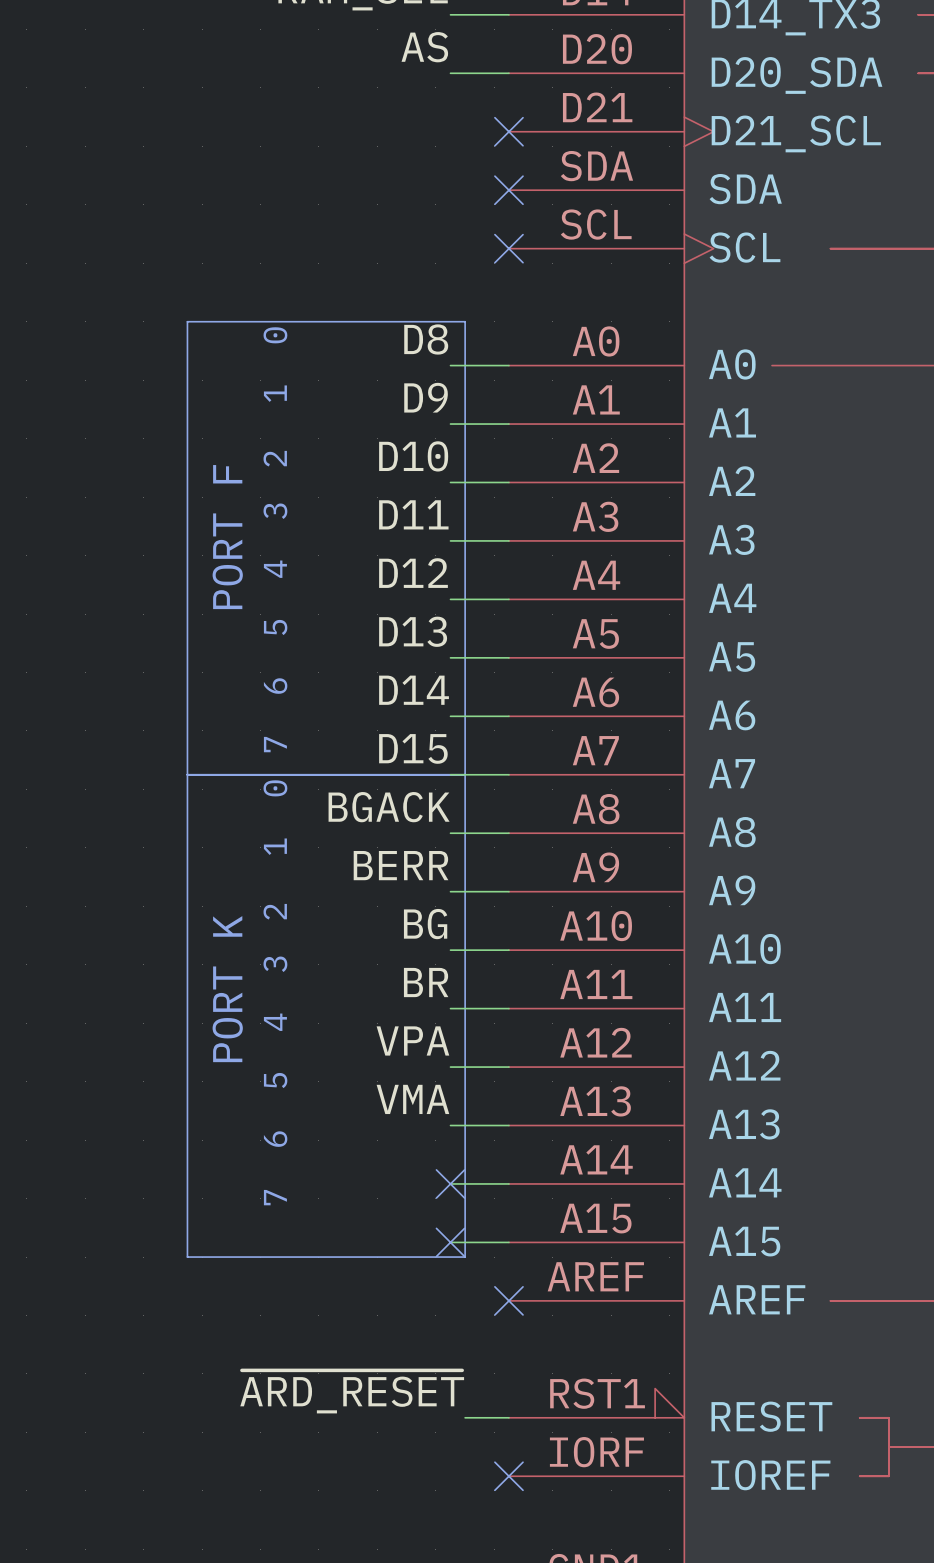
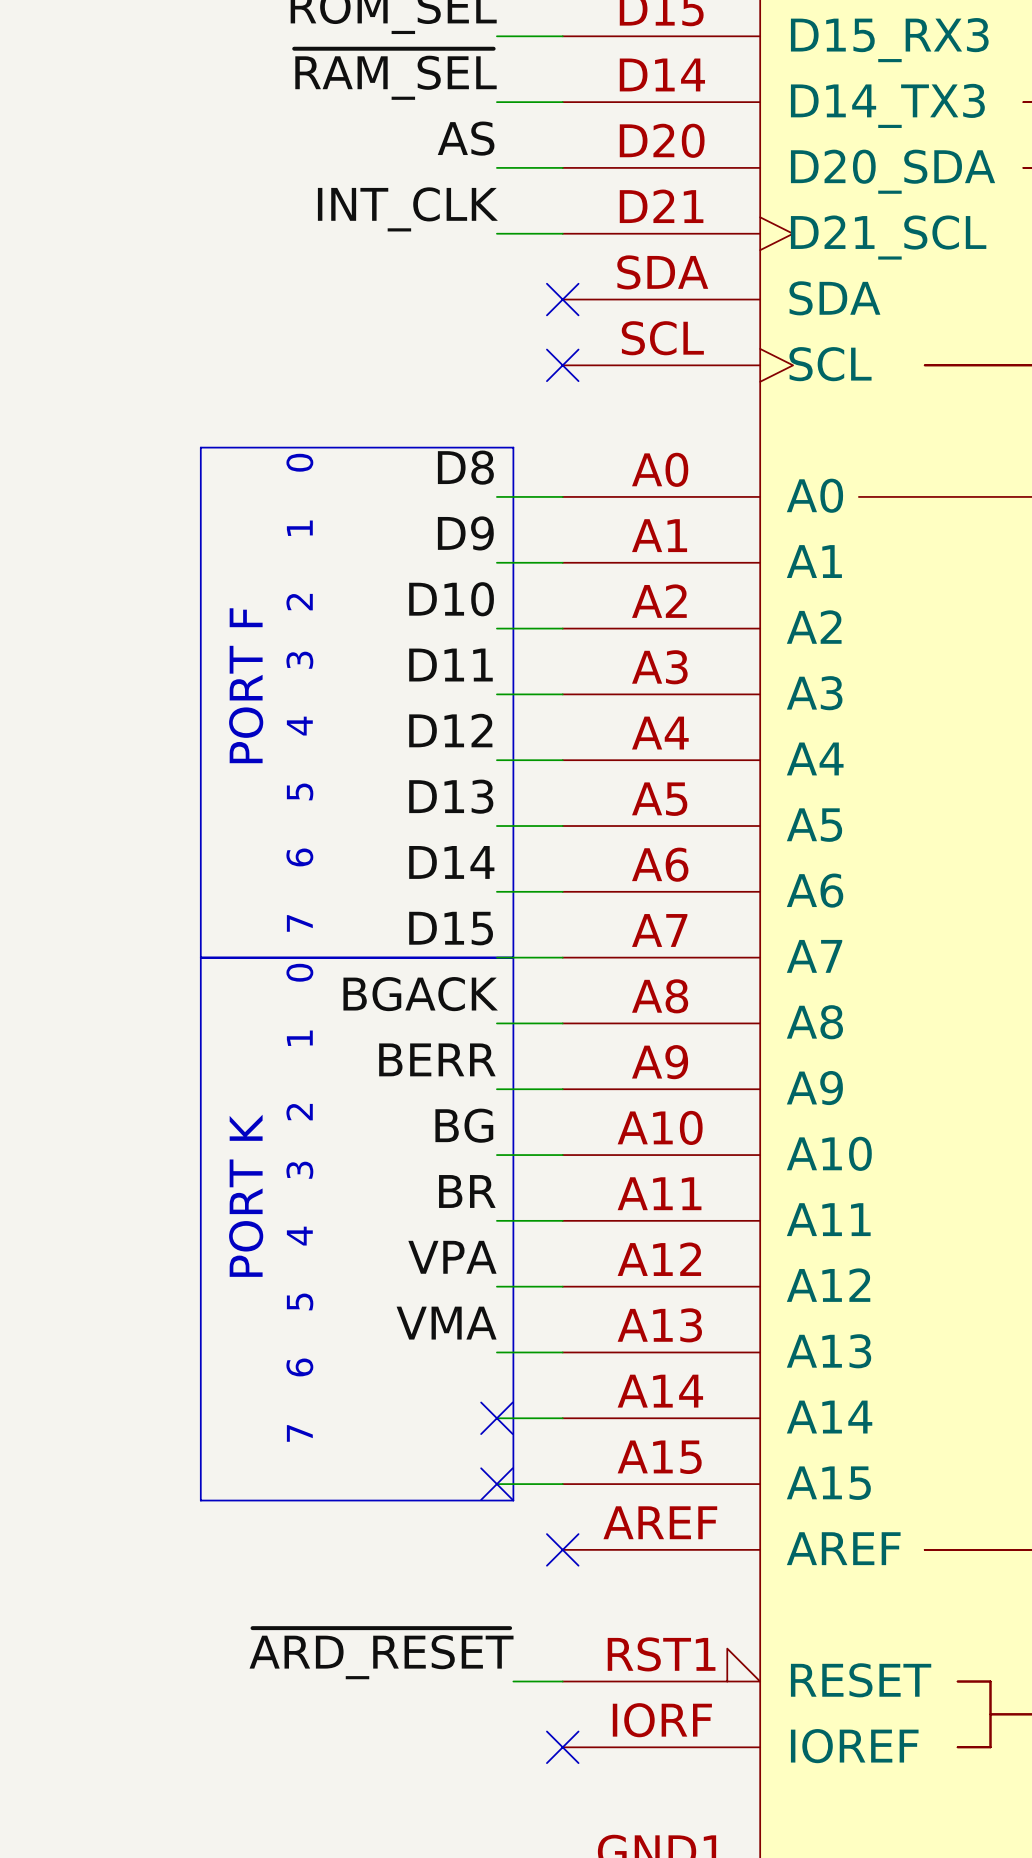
label: none -> INT_CLK (407, 209)
wire: none -> (496, 233) (562, 233)
no-connect mark: (508, 131) -> none

